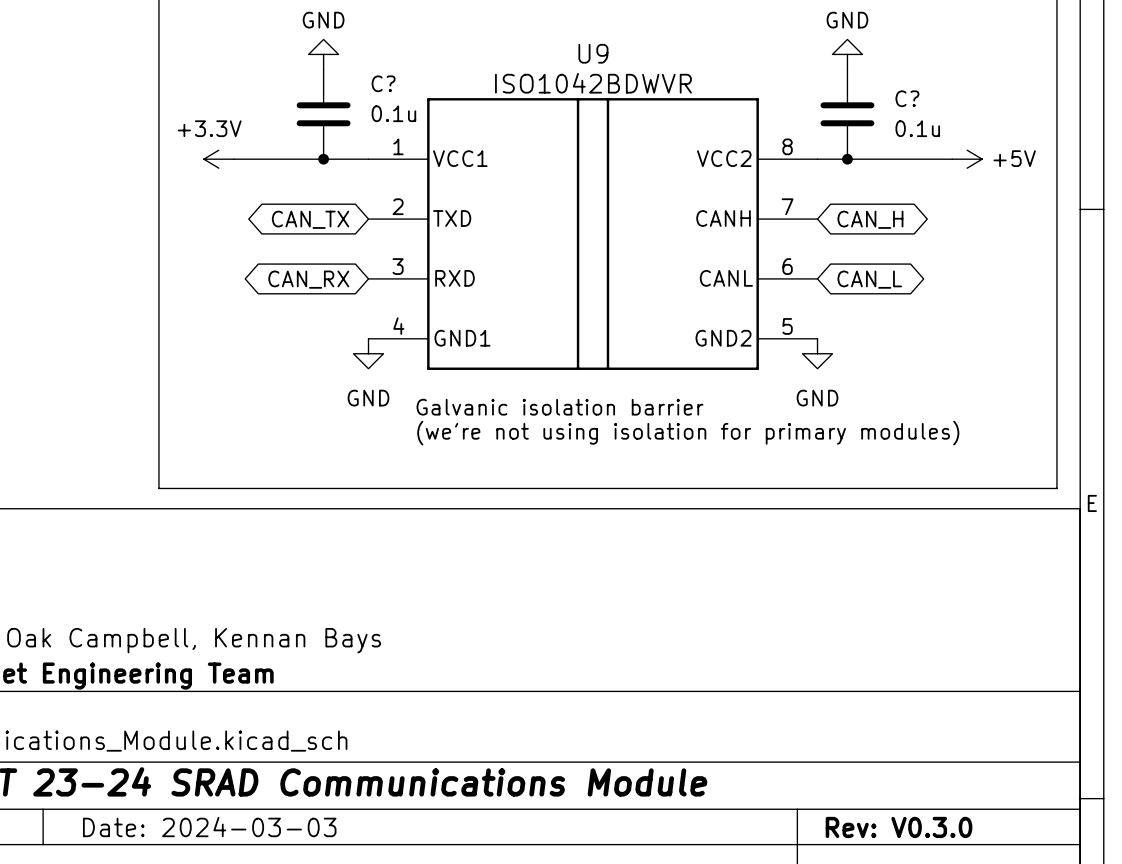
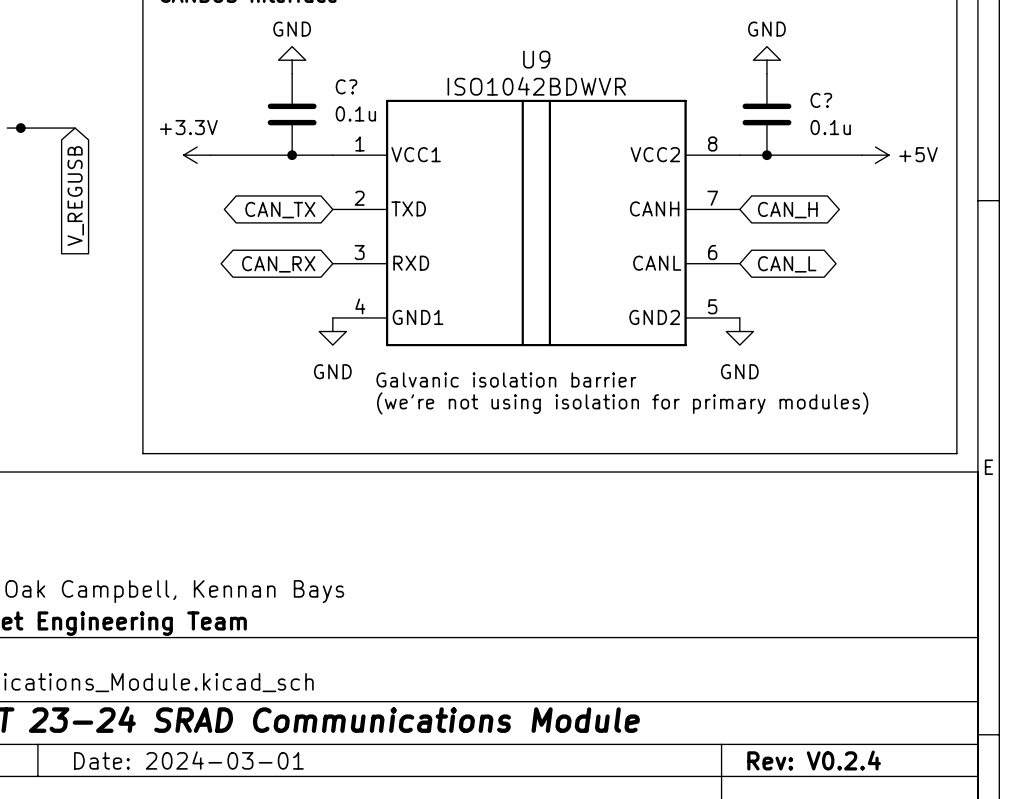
wire: none -> (7, 128) (75, 128)
junction: none -> (20, 128)
global label: none -> V_REGUSB (75, 196)
title block: Date: 2024-03-03 (209, 827) -> Date: 2024-03-01 (188, 760)
title block: Rev: V0.3.0 (899, 827) -> Rev: V0.2.4 (814, 760)

